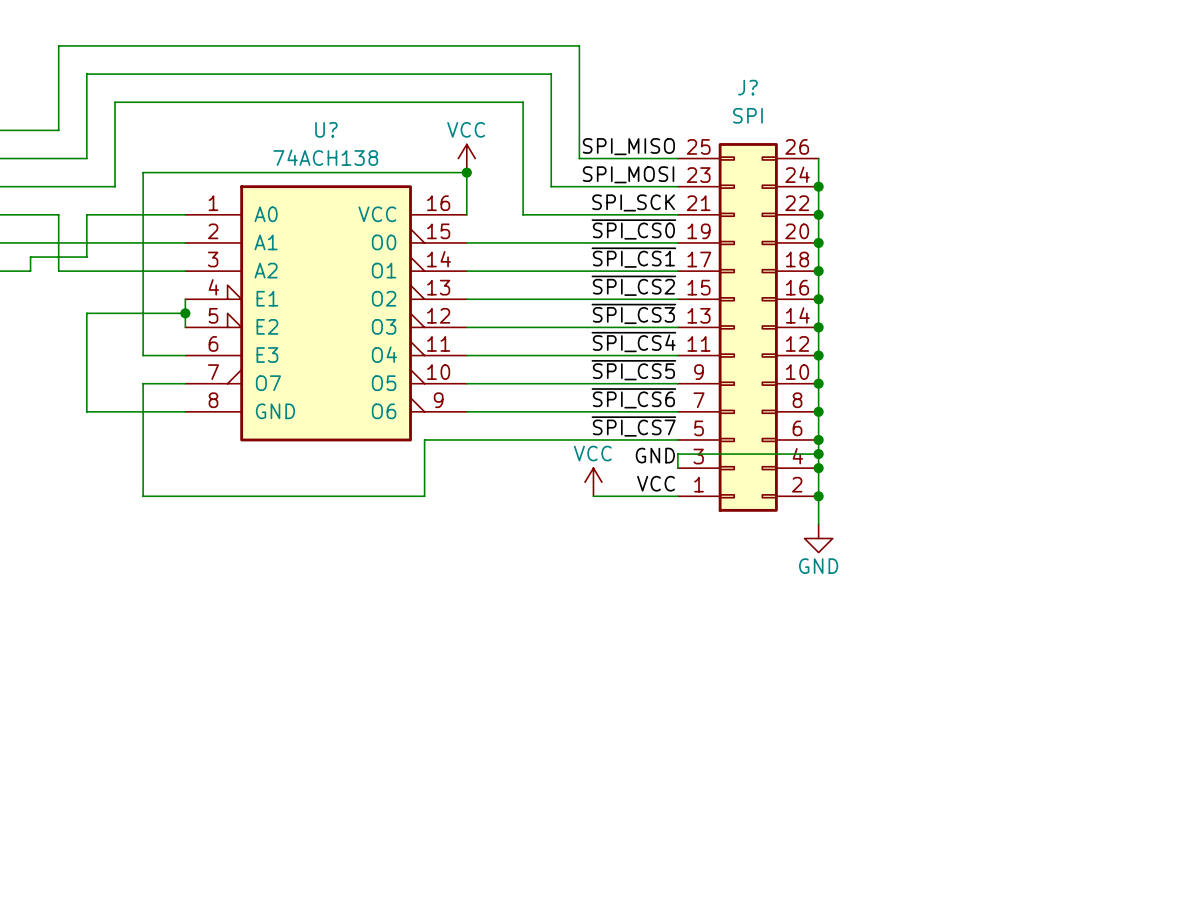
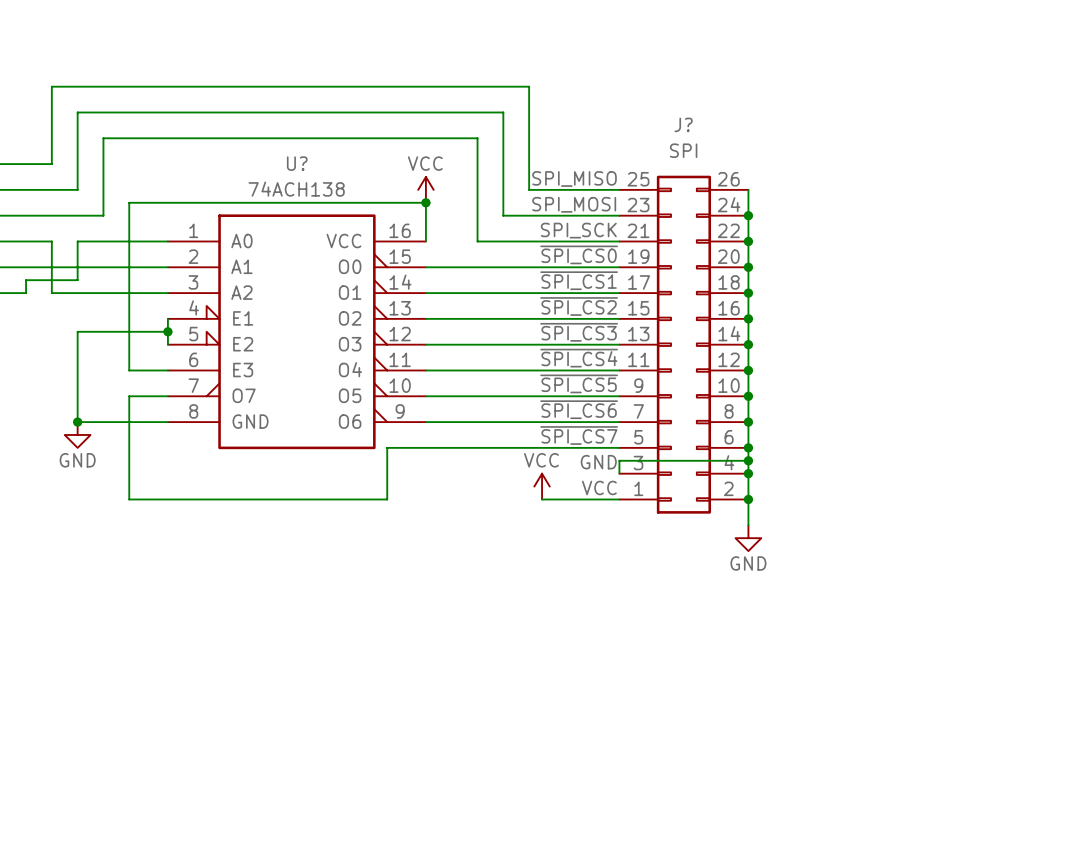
junction: none -> (77, 422)
power symbol: none -> GND (77, 434)

